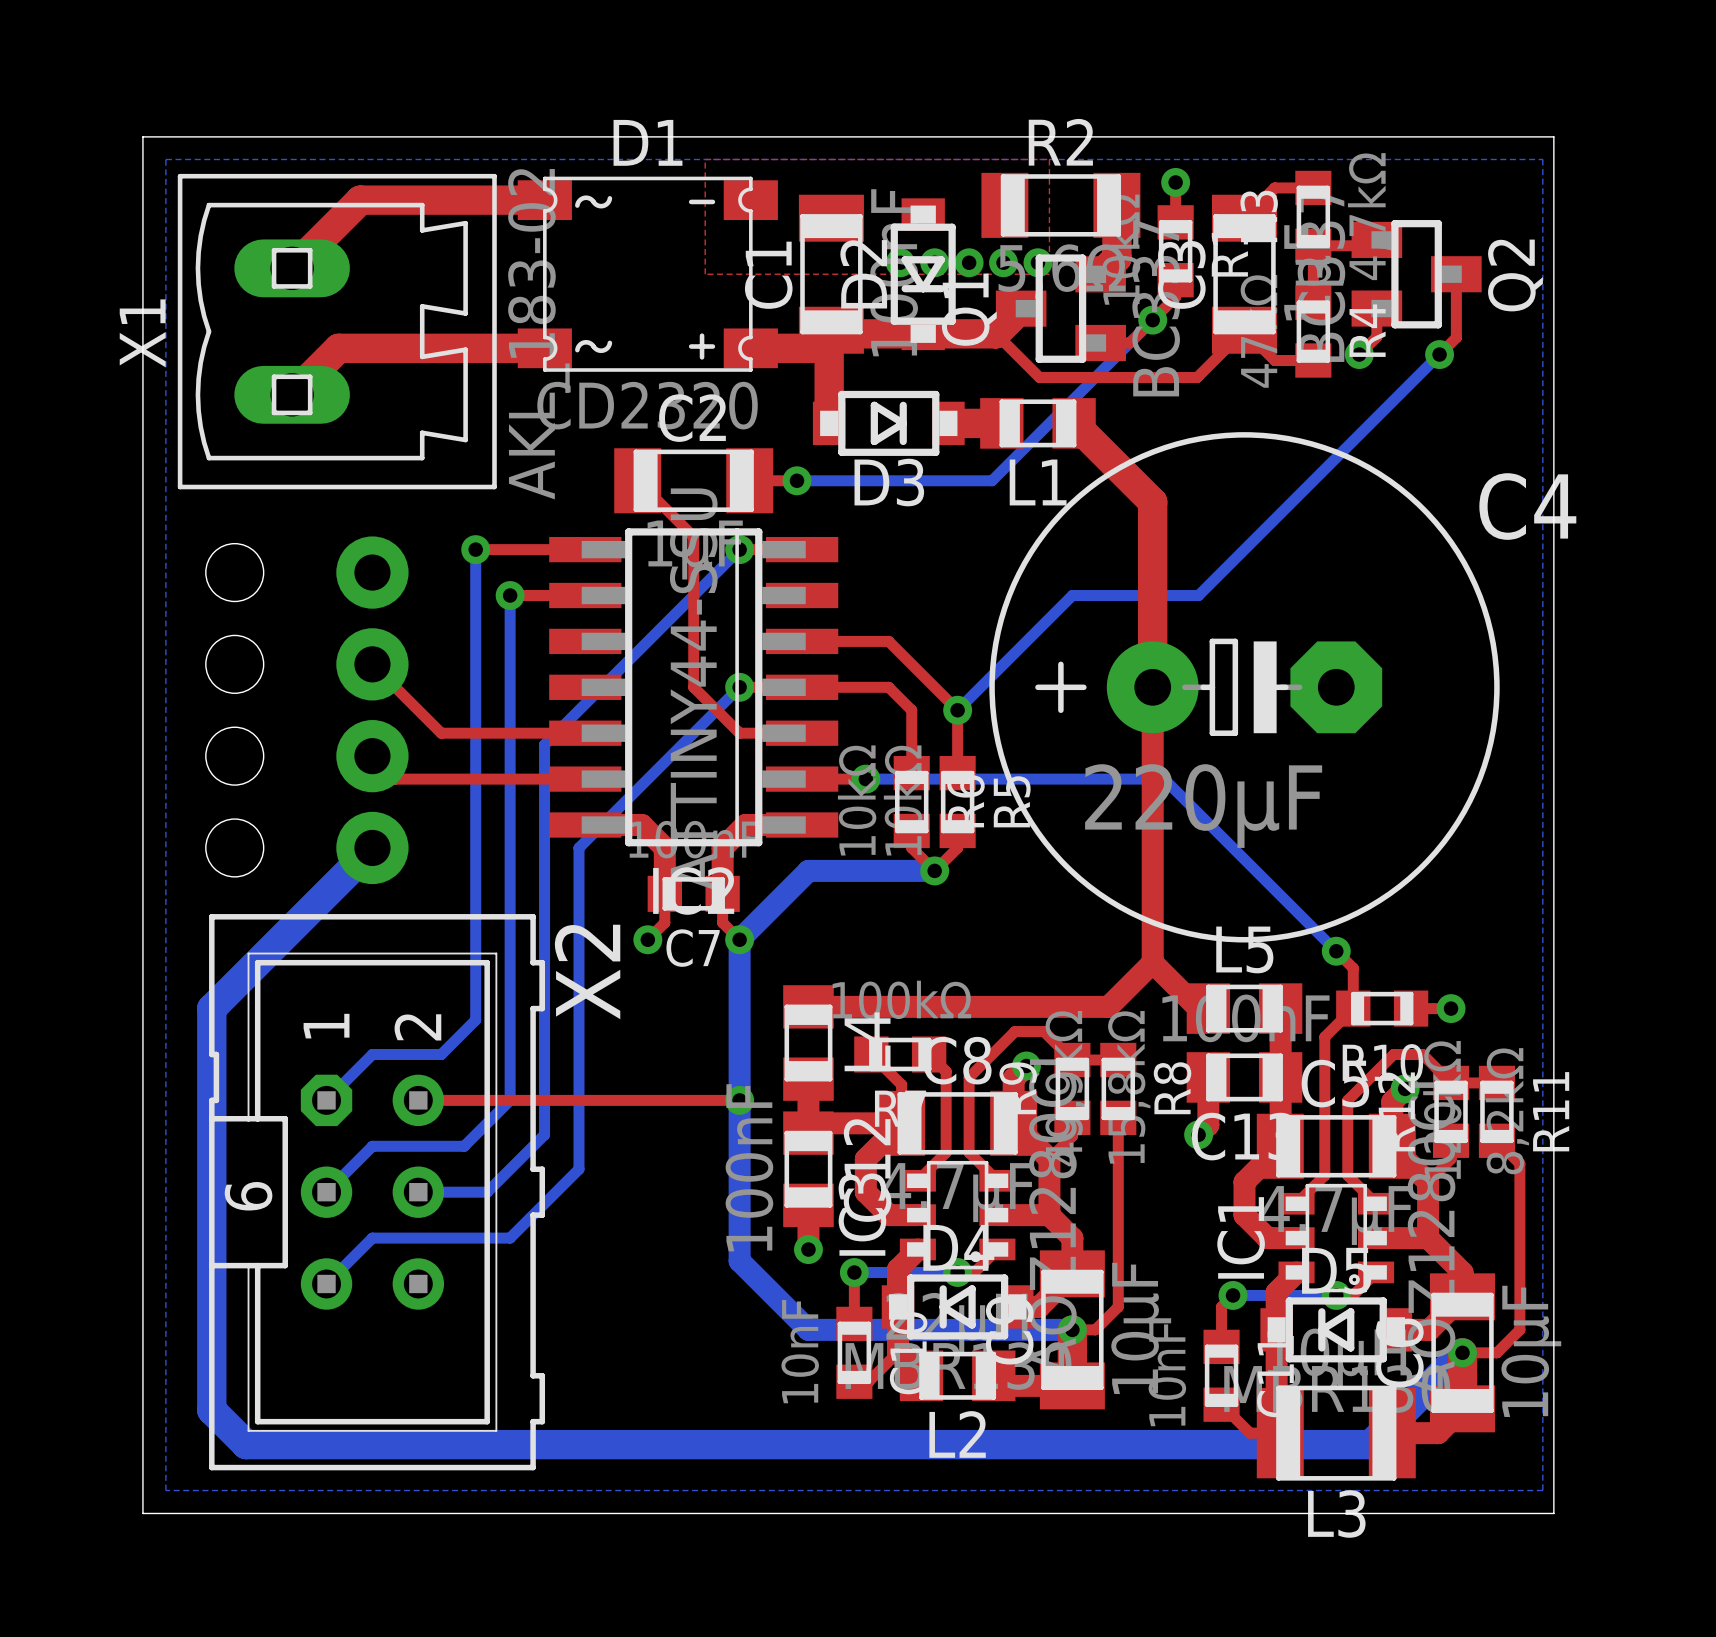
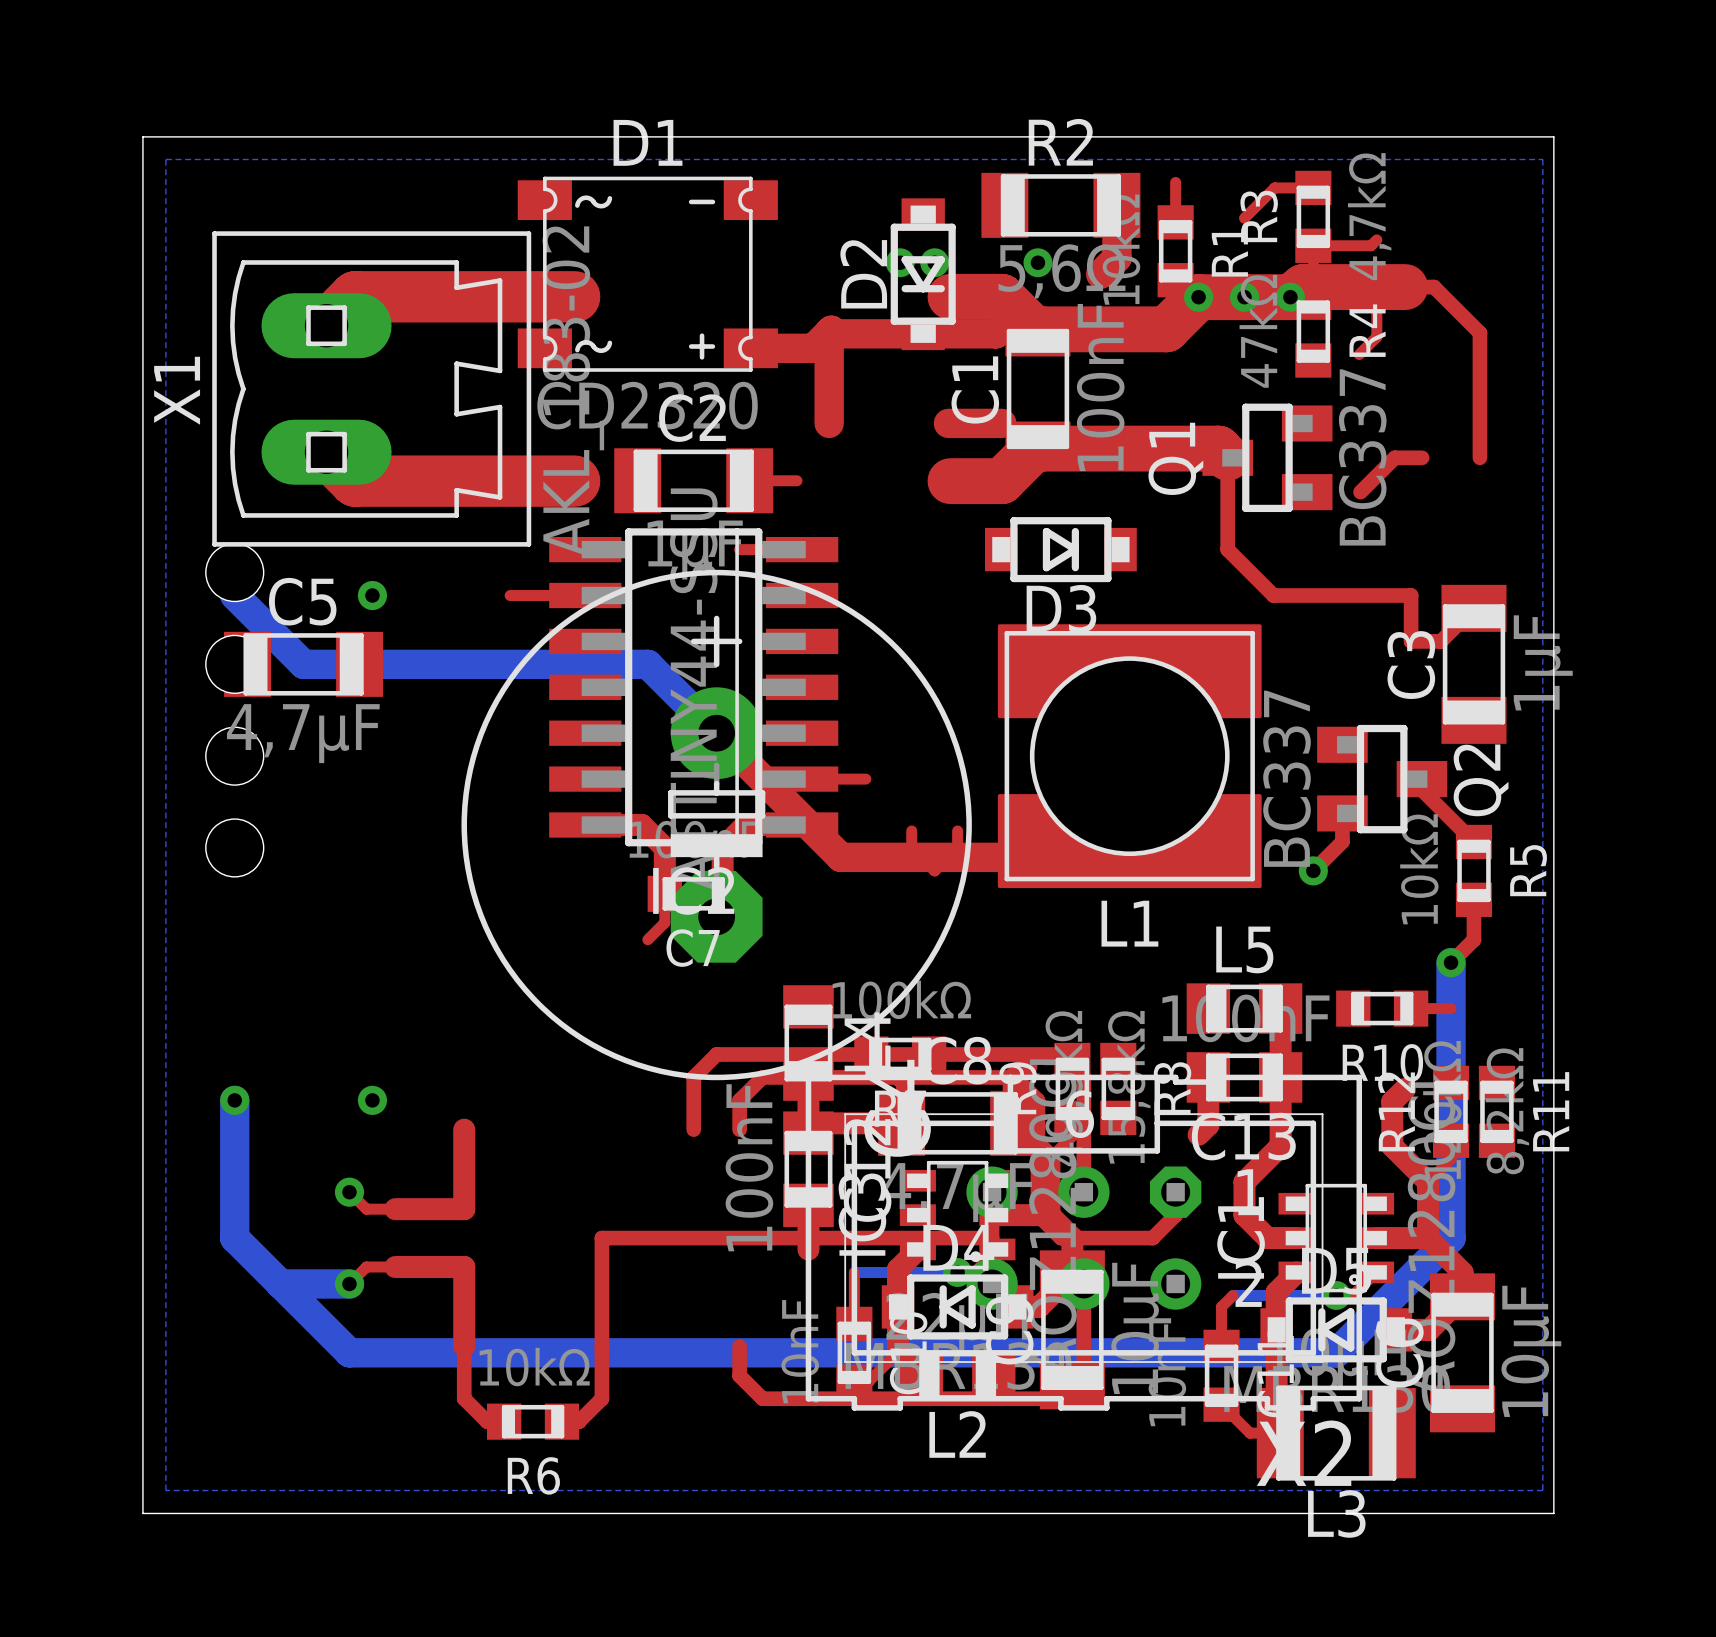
top zone outline: (705, 159) (1049, 159) (1049, 274) (705, 274) (705, 159) -> none
X1 footprint: [177, 173, 497, 490] -> [212, 231, 532, 547]
via: (1175, 182) -> none
top track: (544, 200) (360, 200) (292, 268) -> none
via: (969, 262) -> none
via: (1003, 262) -> none
C1 position: (831, 274) -> (1037, 388)
C3 position: (1244, 274) -> (1473, 664)
Q2 position: (1416, 274) -> (1382, 779)
top track: (1456, 274) (1456, 337) (1439, 354) -> none
top track: none -> (574, 296) (355, 296) (326, 325)
top track: none -> (950, 296) (1001, 296) (1037, 332) (1041, 329) (1166, 329) (1198, 297) (1290, 297) (1303, 287) (1434, 287) (1479, 332) (1479, 457)
via: none -> (1198, 297)
via: none -> (1244, 297)
via: none -> (1290, 297)
Q1 position: (1060, 308) -> (1267, 457)
bottom track: (1152, 320) (992, 480) (796, 480) -> none
via: (1152, 320) -> none
top track: (995, 333) (1039, 377) (1197, 377) (1244, 330) (1274, 360) (1313, 360) -> none
top track: (544, 348) (338, 348) (292, 394) -> none
via: (1359, 354) -> none
bottom track: (1439, 354) (1198, 595) (1072, 595) (957, 710) -> none
via: (1439, 354) -> none
L1 footprint: [980, 398, 1096, 449] -> [997, 624, 1262, 889]
D3 position: (888, 423) -> (1060, 549)
top track: (1074, 423) (1152, 502) (1152, 962) -> none
top track: none -> (326, 452) (355, 481) (574, 481)
top track: none -> (1422, 457) (1394, 457) (1360, 492)
top track: (637, 480) (693, 536) (693, 687) (739, 733) (802, 733) -> none
via: (796, 480) -> none
top track: none -> (950, 481) (1001, 481) (1037, 444) (1041, 448) (1218, 448) (1227, 457) (1227, 549) (1273, 595) (1411, 595) (1411, 641) (1440, 641) (1473, 608)
L1 name position: L1 (1038, 482) -> L1 (1129, 923)
via size: [336, 536, 409, 609] -> [357, 580, 388, 611]
top track: (475, 549) (585, 549) -> none
bottom track: (475, 549) (475, 1020) (441, 1054) (372, 1054) (326, 1100) -> none
via: (475, 549) -> none
bottom track: (739, 549) (544, 744) (544, 1134) (487, 1192) (418, 1192) -> none
via: (739, 549) -> none
bottom track: none -> (234, 595) (303, 664) (647, 664) (716, 733)
bottom track: (510, 595) (510, 1100) (464, 1146) (372, 1146) (326, 1192) -> none
via: (510, 595) -> none
top track: (802, 641) (888, 641) (957, 710) (957, 773) -> none
top track: (372, 664) (441, 733) (585, 733) -> none
via: (372, 664) -> none
top track: (739, 687) (888, 687) (911, 710) (911, 773) -> none
bottom track: (739, 687) (578, 847) (578, 1169) (510, 1238) (372, 1238) (326, 1283) -> none
via: (739, 687) -> none
C4 rotation: 0° (1244, 687) -> 90° clockwise (716, 825)
C4 position: (1244, 687) -> (716, 825)
via: (957, 710) -> none
top track: none -> (716, 733) (840, 857) (1028, 857)
top track: (372, 756) (395, 779) (585, 779) -> none
via: (372, 756) -> none
bottom track: (865, 779) (1164, 779) (1336, 951) -> none
via: (865, 779) -> none
top track: none -> (1421, 779) (1421, 789) (1473, 841)
R6 rotation: 0° (911, 802) -> 90° clockwise (533, 1421)
R6 position: (911, 802) -> (533, 1421)
R5 position: (957, 802) -> (1473, 870)
C4 value: 220μF (1203, 806) -> none
top track: none -> (1342, 813) (1342, 841) (1313, 870)
bottom track: (372, 847) (211, 1008) (211, 1410) (246, 1444) (1370, 1444) (1462, 1352) -> none
via: (372, 847) -> none
bottom track: (934, 870) (808, 870) (739, 939) (739, 1261) (808, 1329) (1072, 1329) -> none
via: (934, 870) -> none
via: none -> (1313, 870)
top track: none -> (1473, 899) (1473, 939) (1451, 962)
via: (647, 939) -> none
via: (739, 939) -> none
top track: (1336, 951) (1353, 968) (1353, 1008) (1324, 1037) (1324, 1175) (1296, 1203) -> none
via: (1336, 951) -> none
top track: (1152, 962) (1198, 1008) (1208, 1008) -> none
top track: (1152, 962) (1108, 1006) (808, 1006) -> none
bottom track: none -> (1451, 962) (1451, 1238) (1336, 1352) (349, 1352) (234, 1238) (234, 1100)
via position: (1451, 1008) -> (1451, 962)
top track: (929, 1054) (946, 1071) (946, 1152) (917, 1180) -> none
top track: (1118, 1060) (1072, 1060) (1043, 1031) (1015, 1031) (969, 1077) (969, 1152) (997, 1180) -> none
via: (1026, 1065) -> none
top track: (1496, 1082) (1451, 1082) (1422, 1054) (1393, 1054) (1347, 1100) (1347, 1175) (1376, 1203) -> none
via: (1405, 1088) -> none
via: none -> (234, 1100)
via: none -> (372, 1100)
top track: (418, 1100) (739, 1100) -> none
via: (739, 1100) -> none
top track: (1118, 1117) (1118, 1306) (1095, 1329) (1072, 1329) (1072, 1385) (1003, 1385) (993, 1375) -> none
top track: (901, 1123) (865, 1159) (865, 1192) (888, 1215) (917, 1215) -> none
top track: none -> (464, 1129) (464, 1209) (366, 1209) (349, 1192)
top track: none -> (693, 1129) (693, 1077) (716, 1054) (1060, 1054) (1083, 1077) (1083, 1192)
top track: none -> (739, 1129) (739, 1100) (762, 1077) (1015, 1077) (1037, 1100) (1037, 1215) (1060, 1238) (1152, 1238) (1175, 1215) (1175, 1192)
via: (1198, 1134) -> none
top track: (1496, 1140) (1519, 1163) (1519, 1329) (1496, 1352) (1462, 1352) (1462, 1408) (1438, 1433) (1392, 1433) -> none
C5 position: (1336, 1146) -> (303, 664)
via: none -> (349, 1192)
X2 rotation: 0° (377, 1192) -> 90° clockwise (1083, 1242)
X2 position: (377, 1192) -> (1083, 1242)
top track: none -> (992, 1192) (992, 1238) (601, 1238) (601, 1398) (578, 1421) (561, 1421)
via: (808, 1249) -> none
via: (854, 1272) -> none
bottom track: none -> (280, 1283) (349, 1283)
top track: none -> (349, 1283) (366, 1267) (464, 1267) (464, 1398) (487, 1421) (504, 1421)
via: none -> (349, 1283)
top track: none -> (1083, 1283) (1083, 1375) (1060, 1398) (762, 1398) (739, 1375) (739, 1346)
via: (1233, 1295) -> none
via: (1072, 1329) -> none
via: (1462, 1352) -> none

